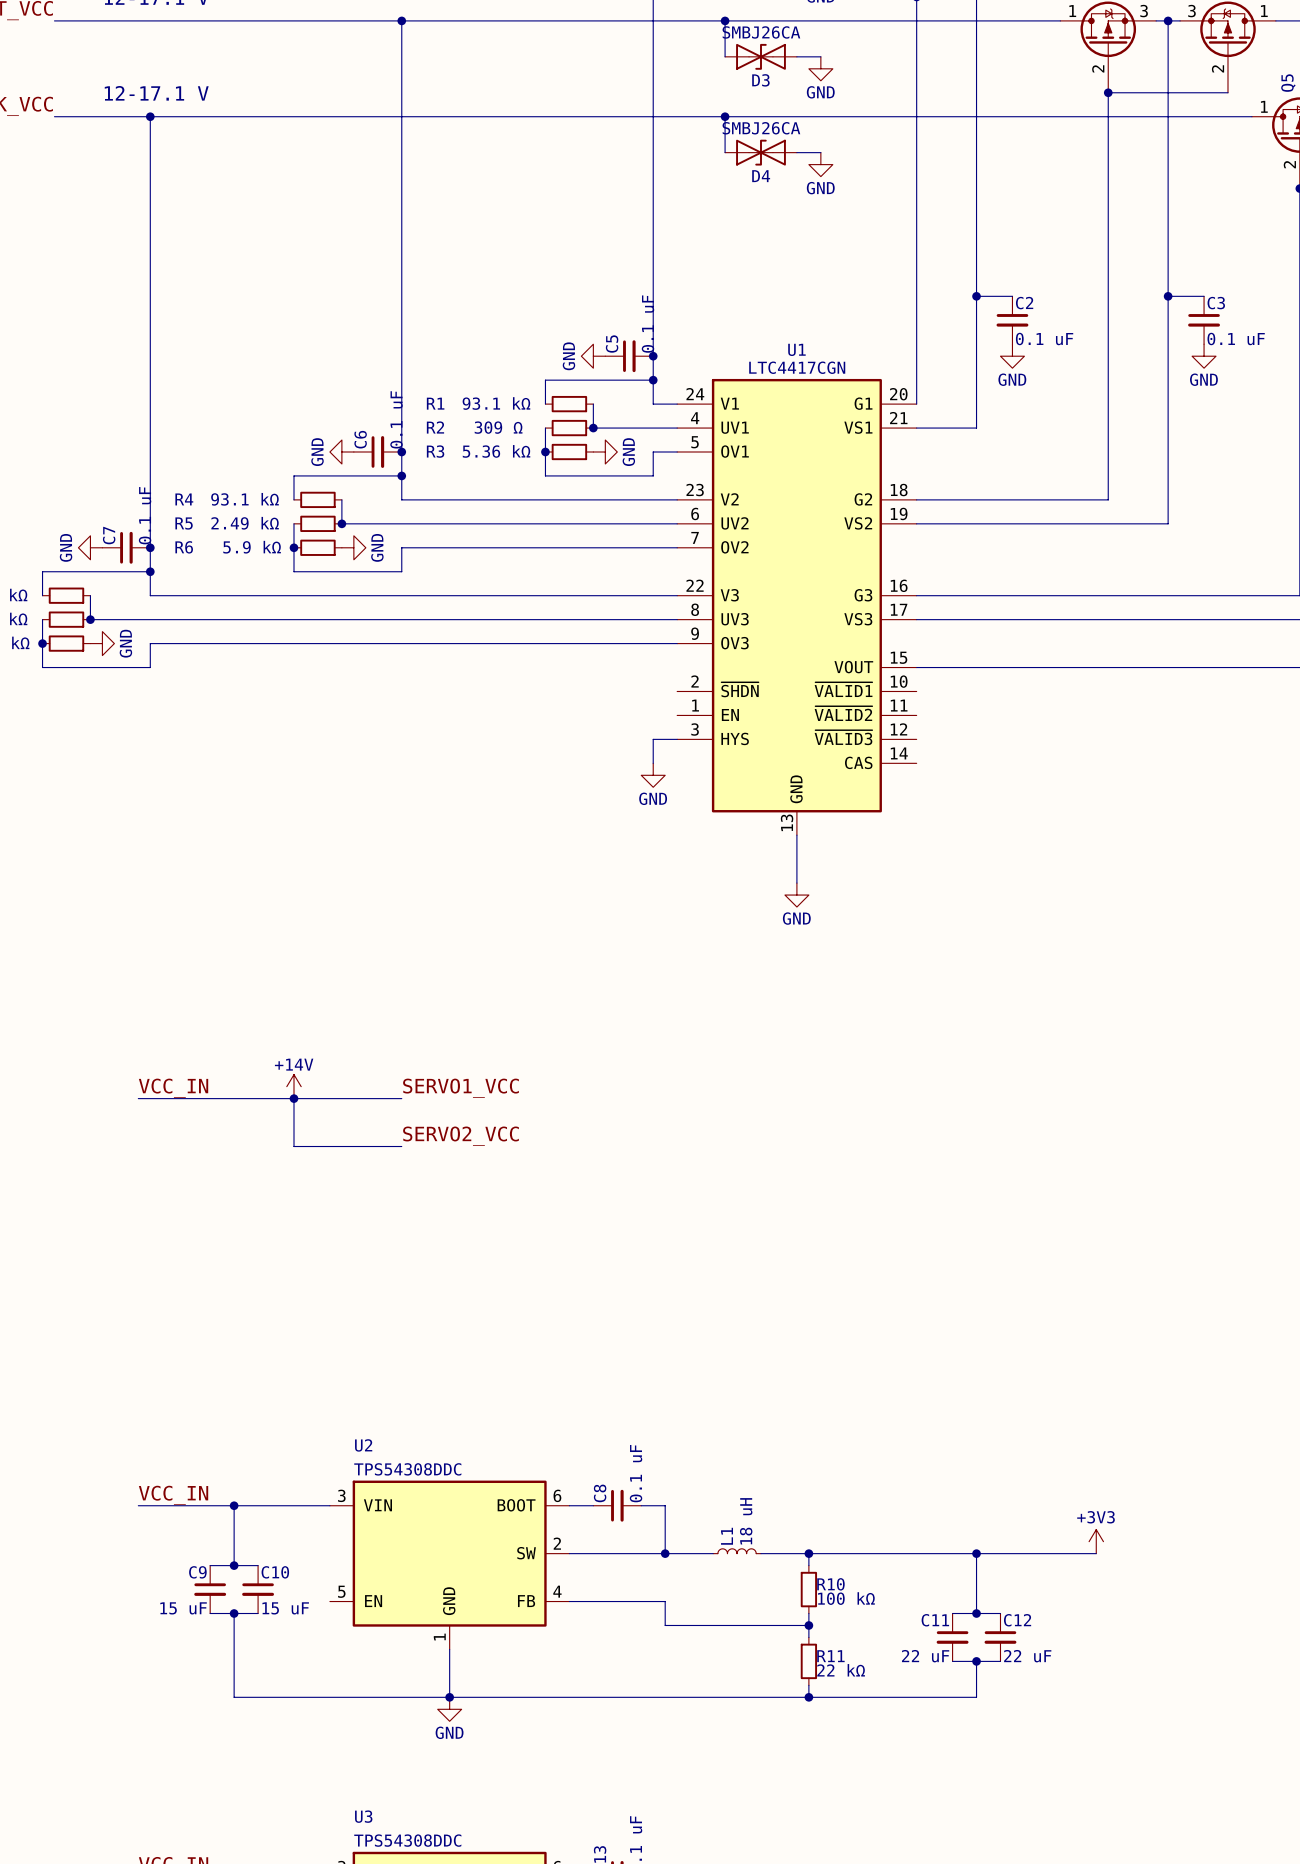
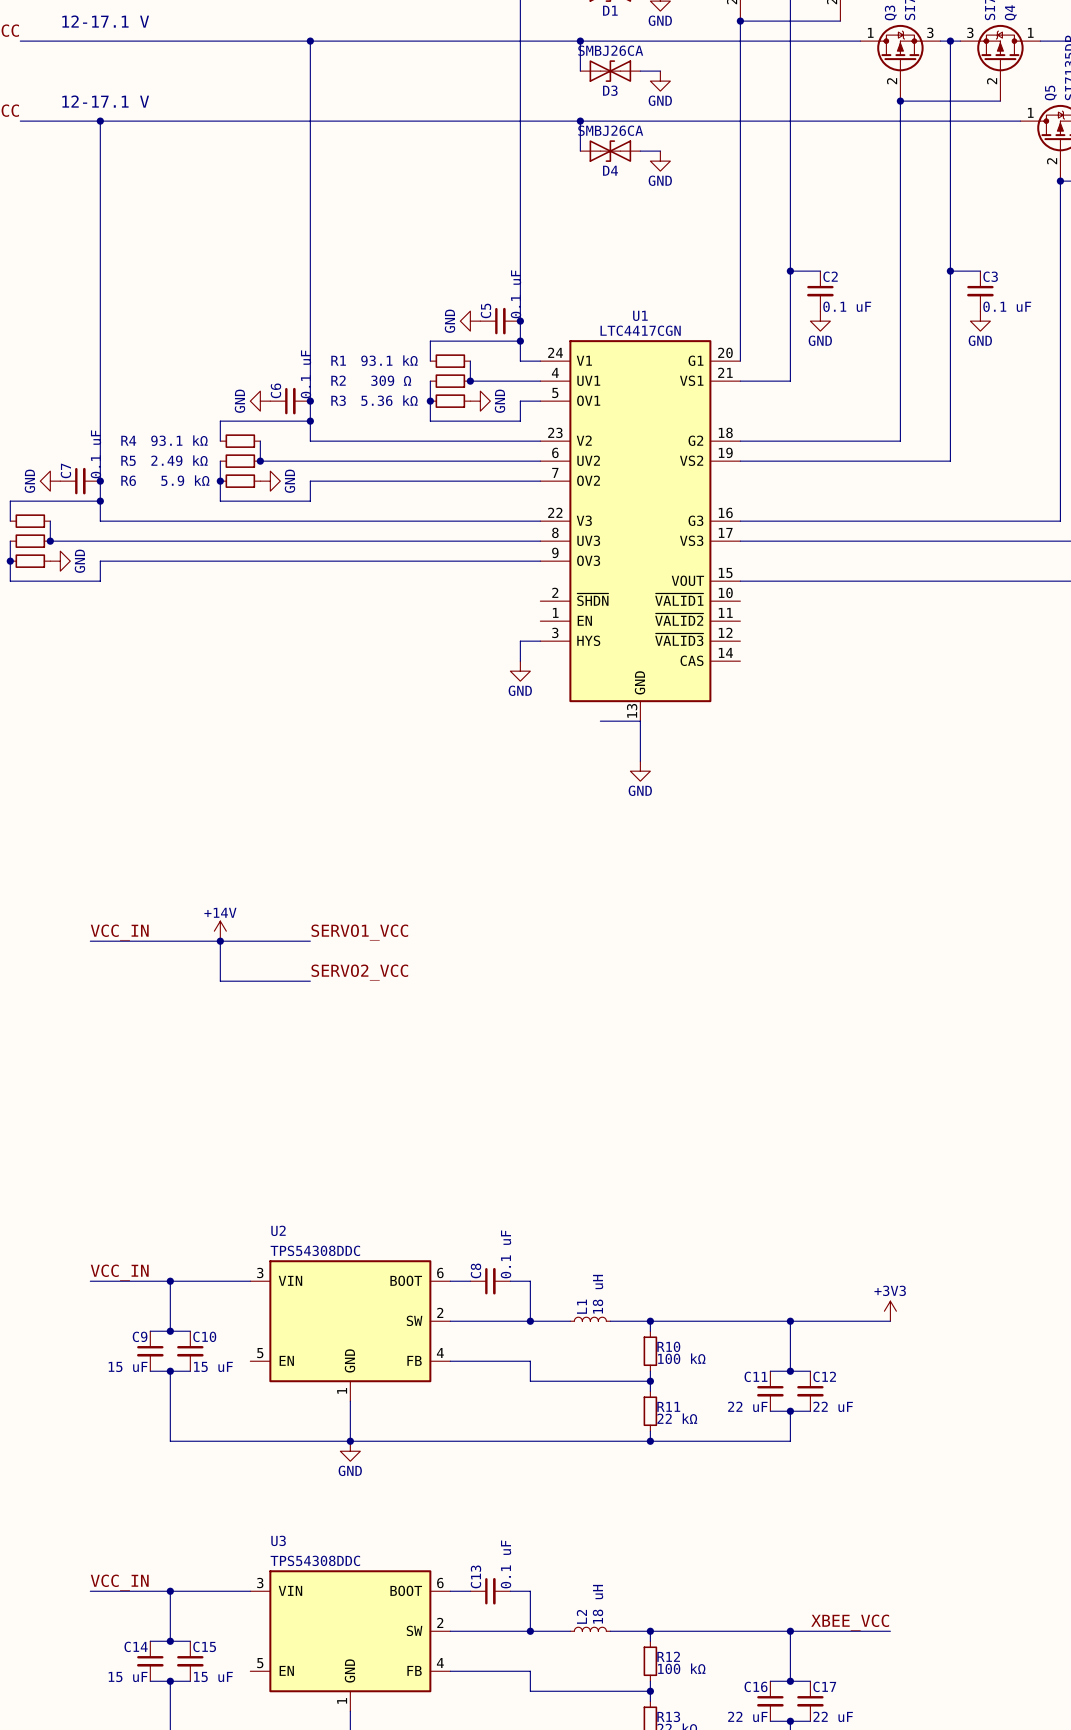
wire: none -> (600, 721) (640, 721)

